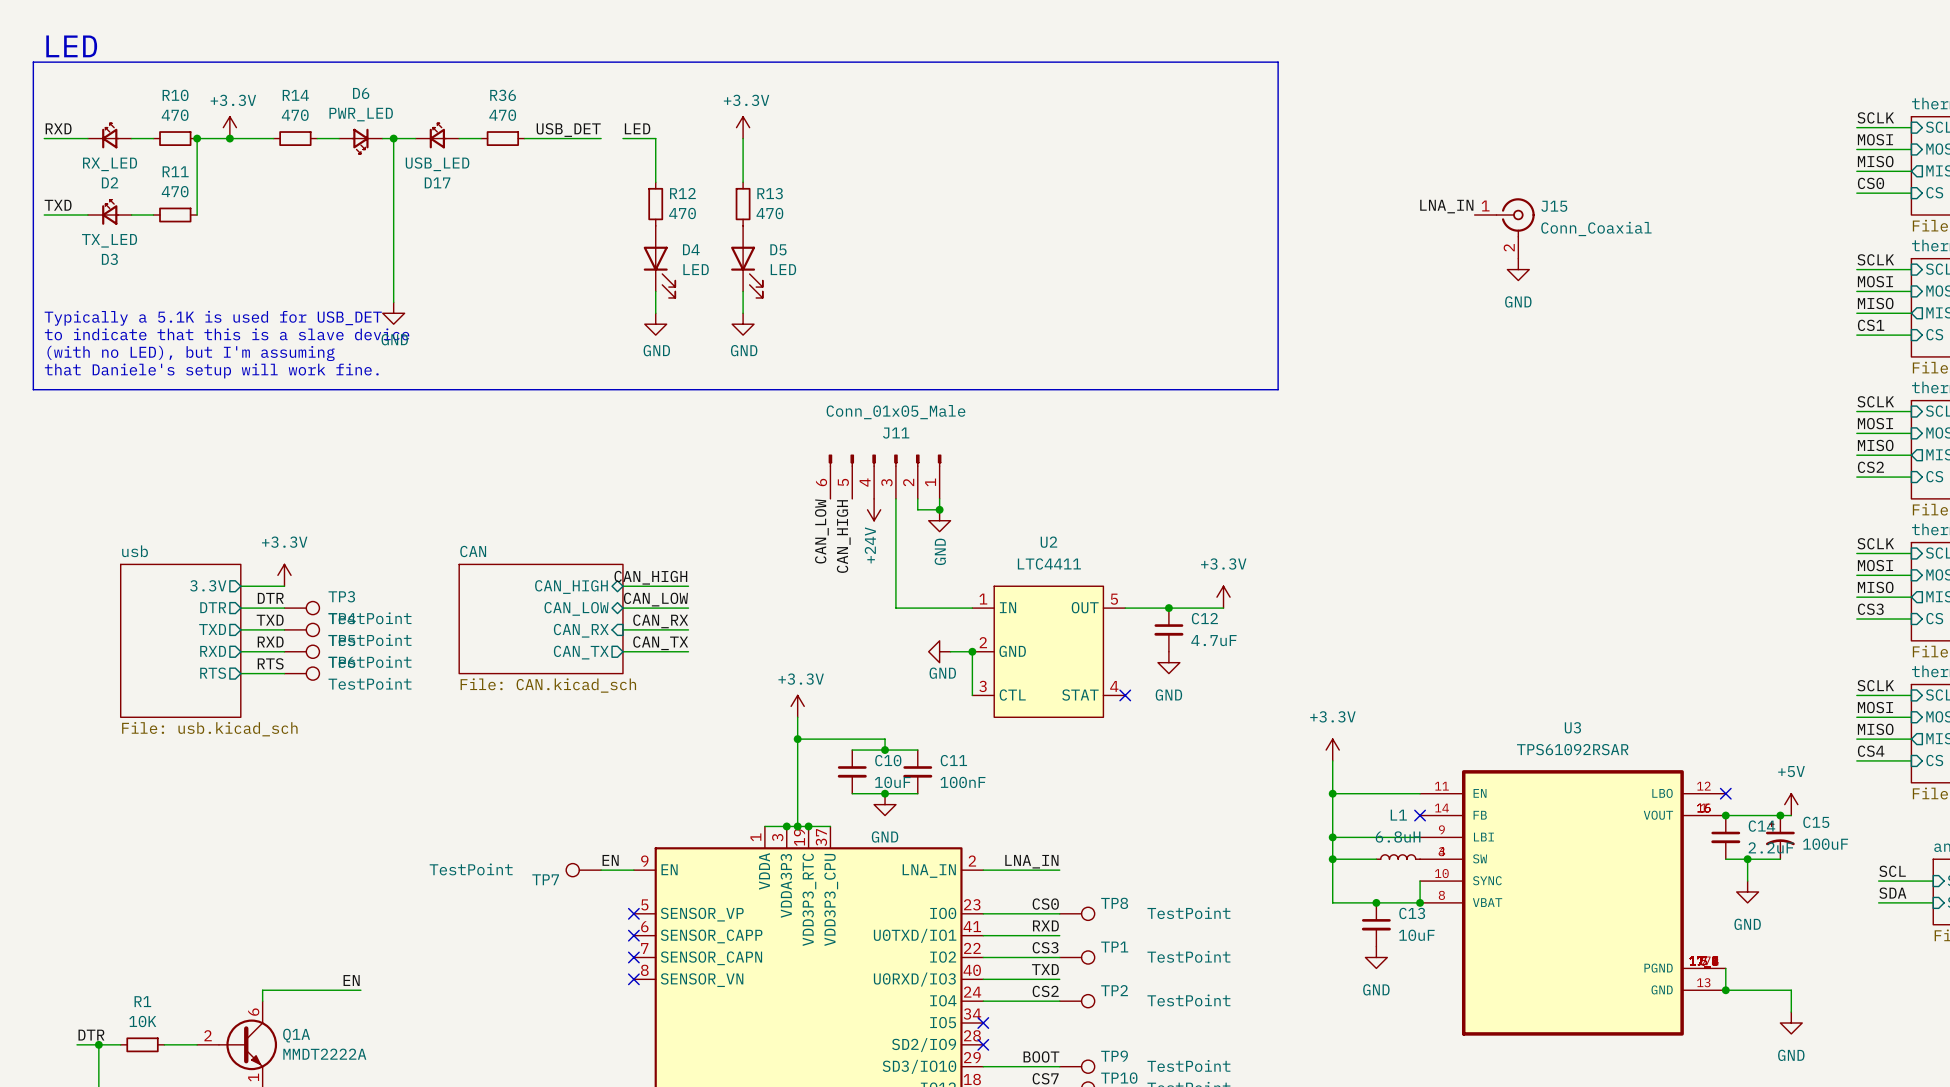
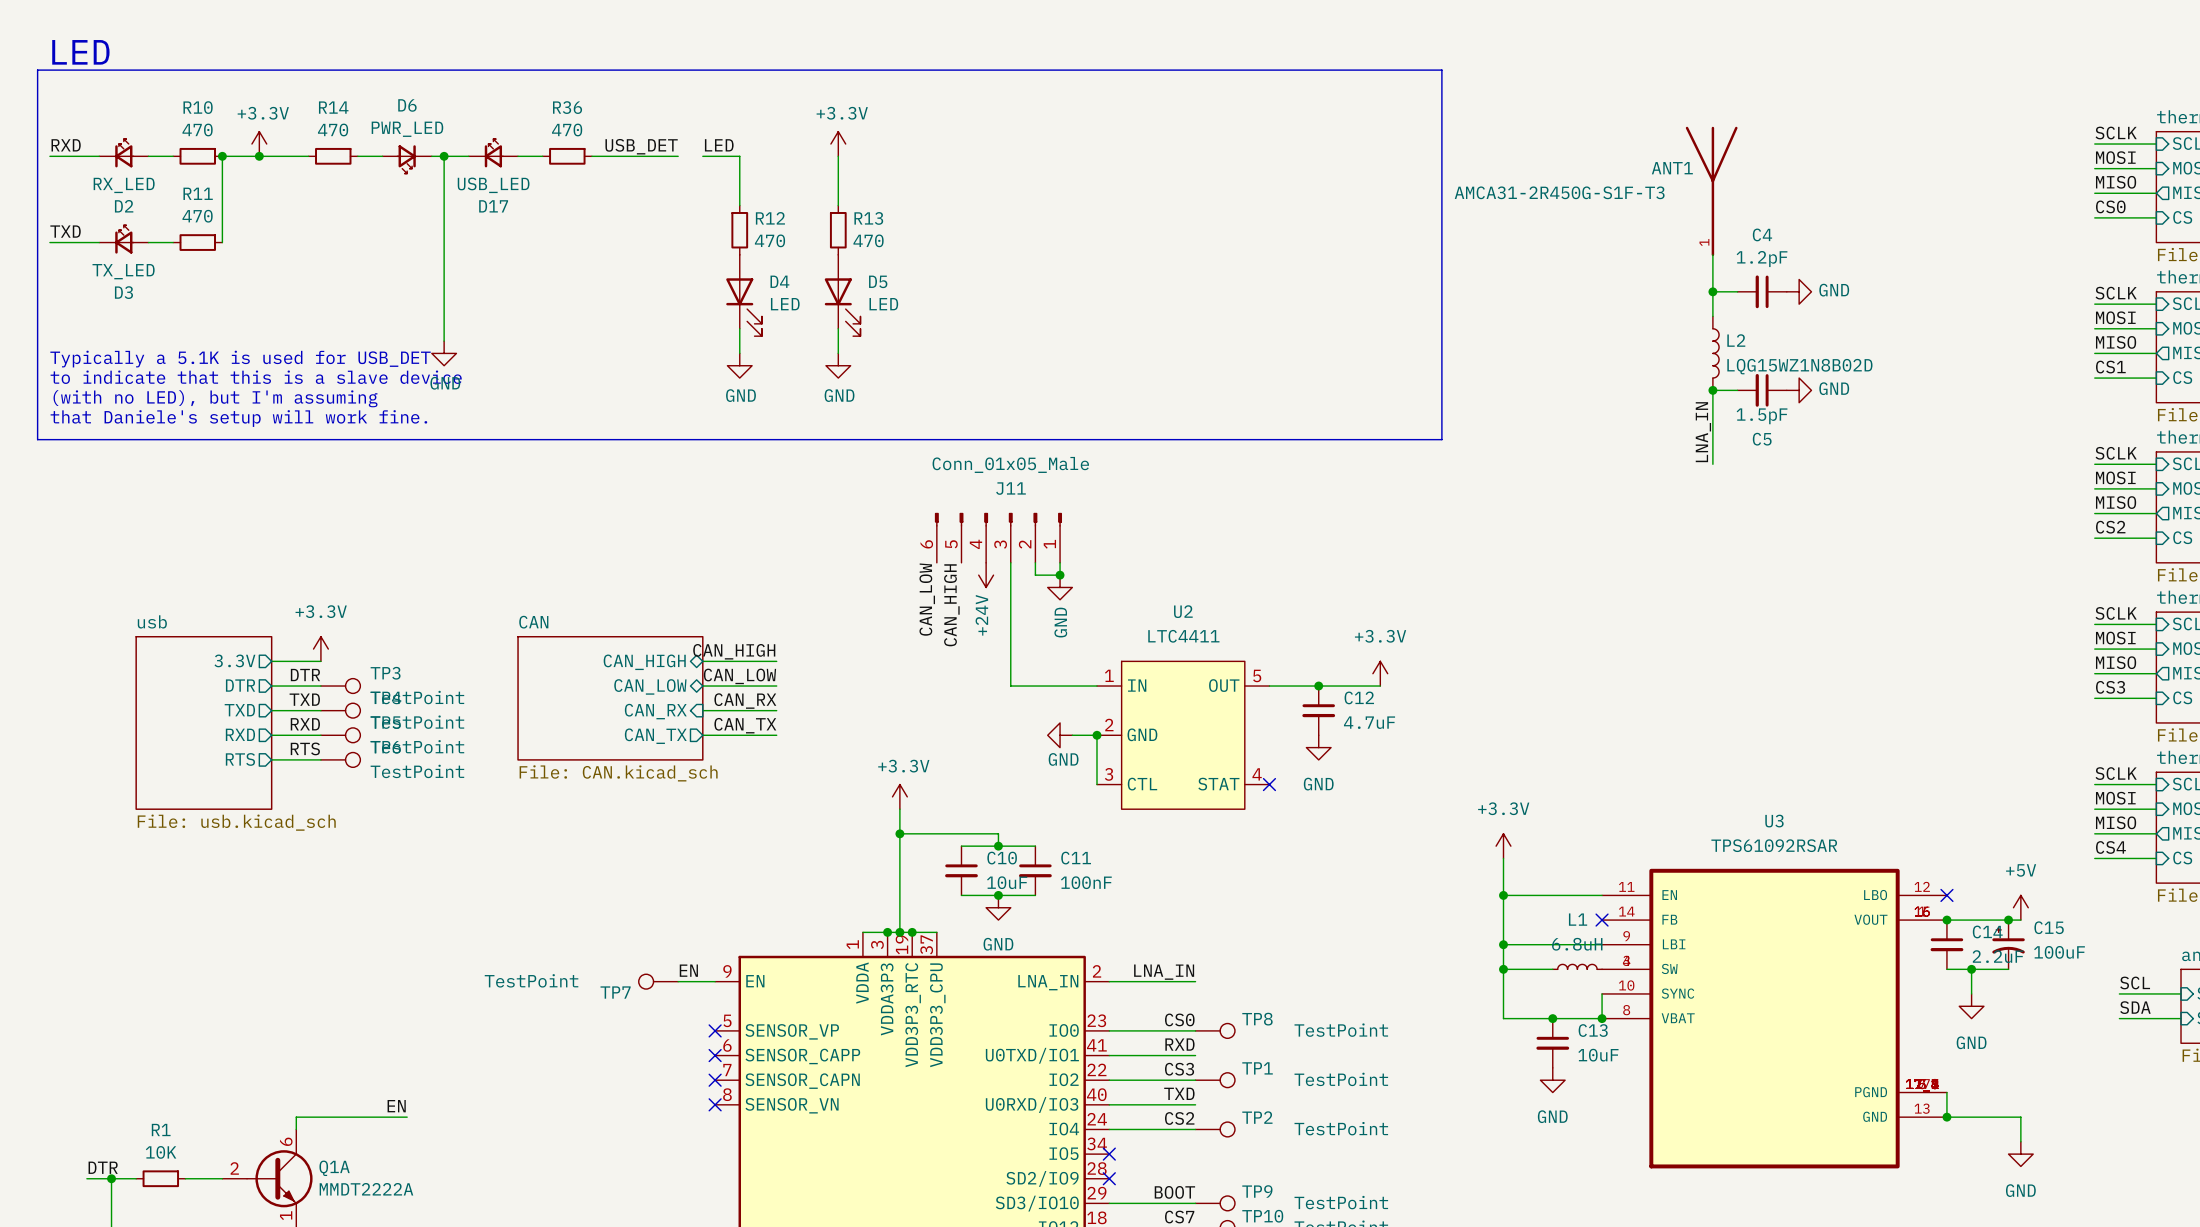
ANT1: none -> AMCA31-2R450G-S1F-T3 (1711, 191)
label rotation: 0° (1446, 206) -> 90° counterclockwise (1703, 432)
label position: LNA_IN (1446, 206) -> LNA_IN (1703, 432)
J15: Conn_Coaxial (1504, 228) -> none
wire: none -> (1712, 291) (1737, 291)
junction: none -> (1712, 291)
C4: none -> 1.2pF (1762, 291)
power symbol: none -> GND (1799, 291)
power symbol: GND (1518, 269) -> none
L2: none -> LQG15WZ1N8B02D (1715, 353)
junction: none -> (1712, 390)
wire: none -> (1737, 390) (1712, 390) (1712, 464)
C5: none -> 1.5pF (1762, 390)
power symbol: none -> GND (1799, 390)

